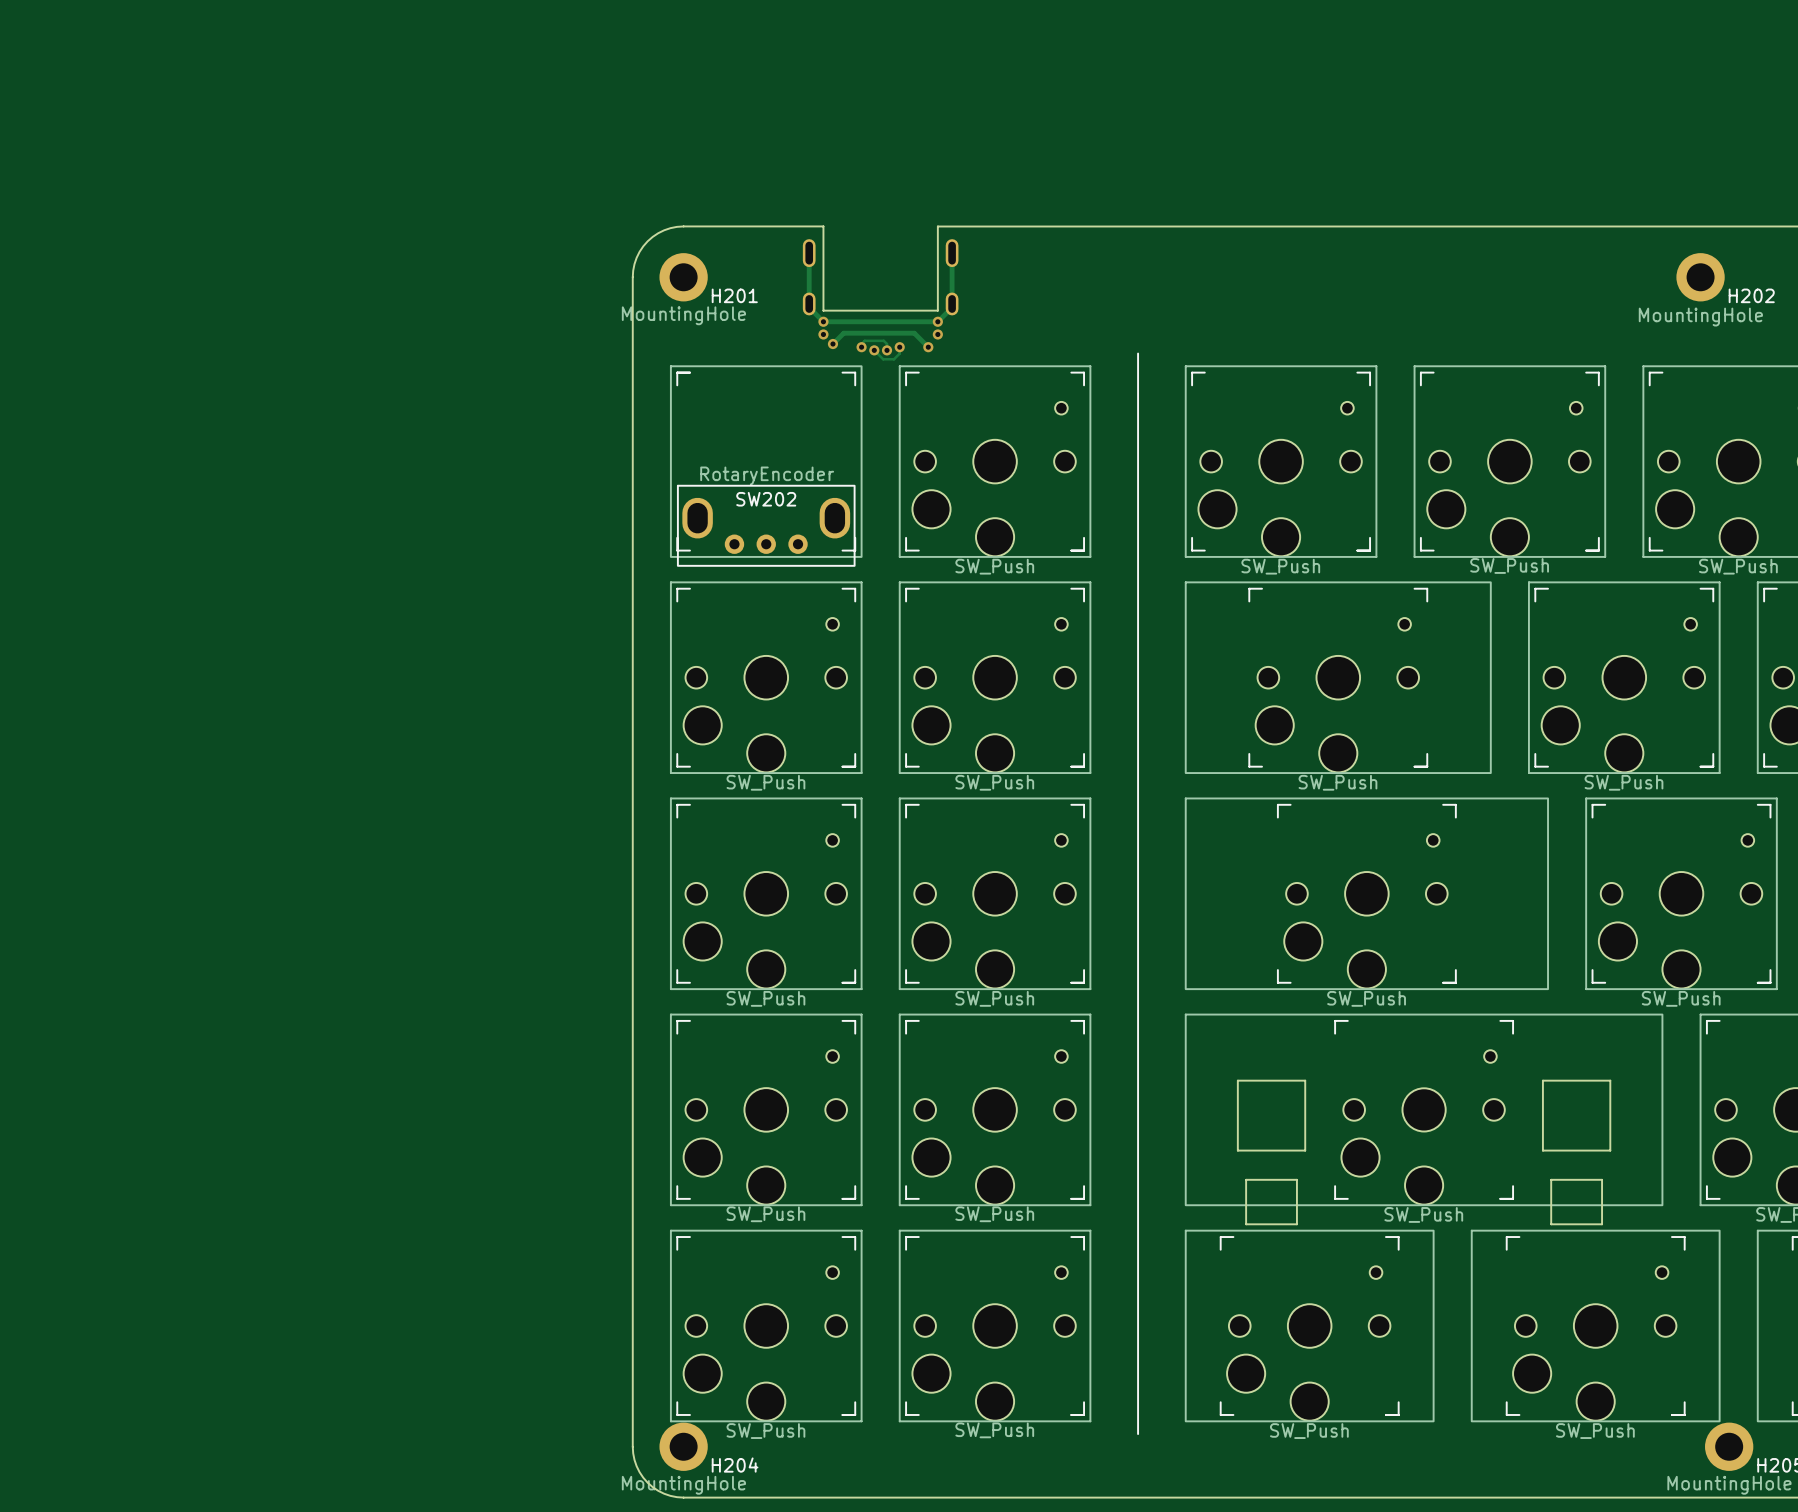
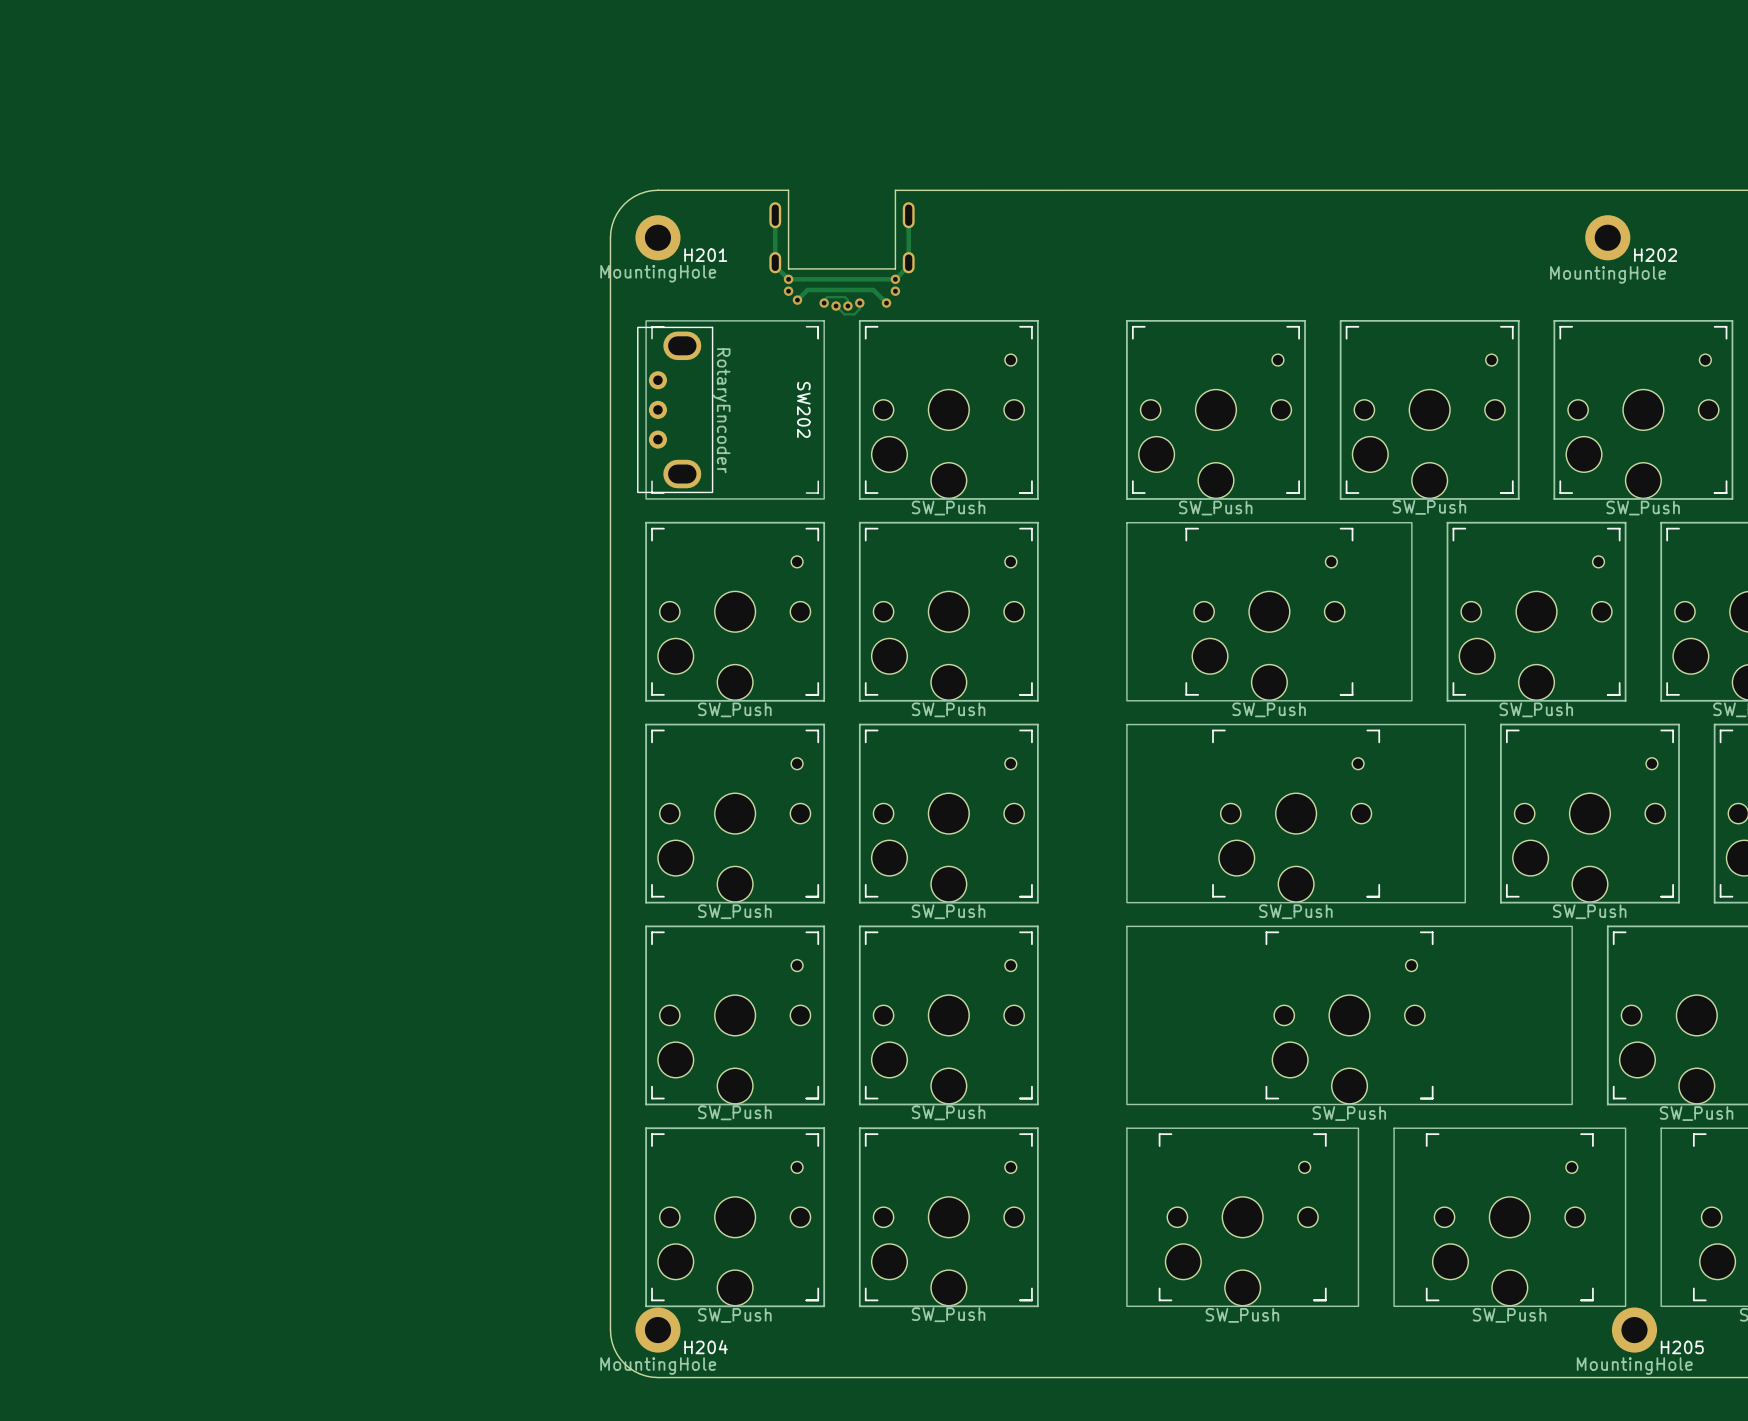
line: (1138, 353) (1138, 1434) -> none
SW202 rotation: 0° (766, 466) -> 90° clockwise (730, 409)
SW202 name position: SW202 (766, 499) -> SW202 (803, 409)
part footprint: [1185, 1013, 1664, 1226] -> [1126, 925, 1573, 1106]

